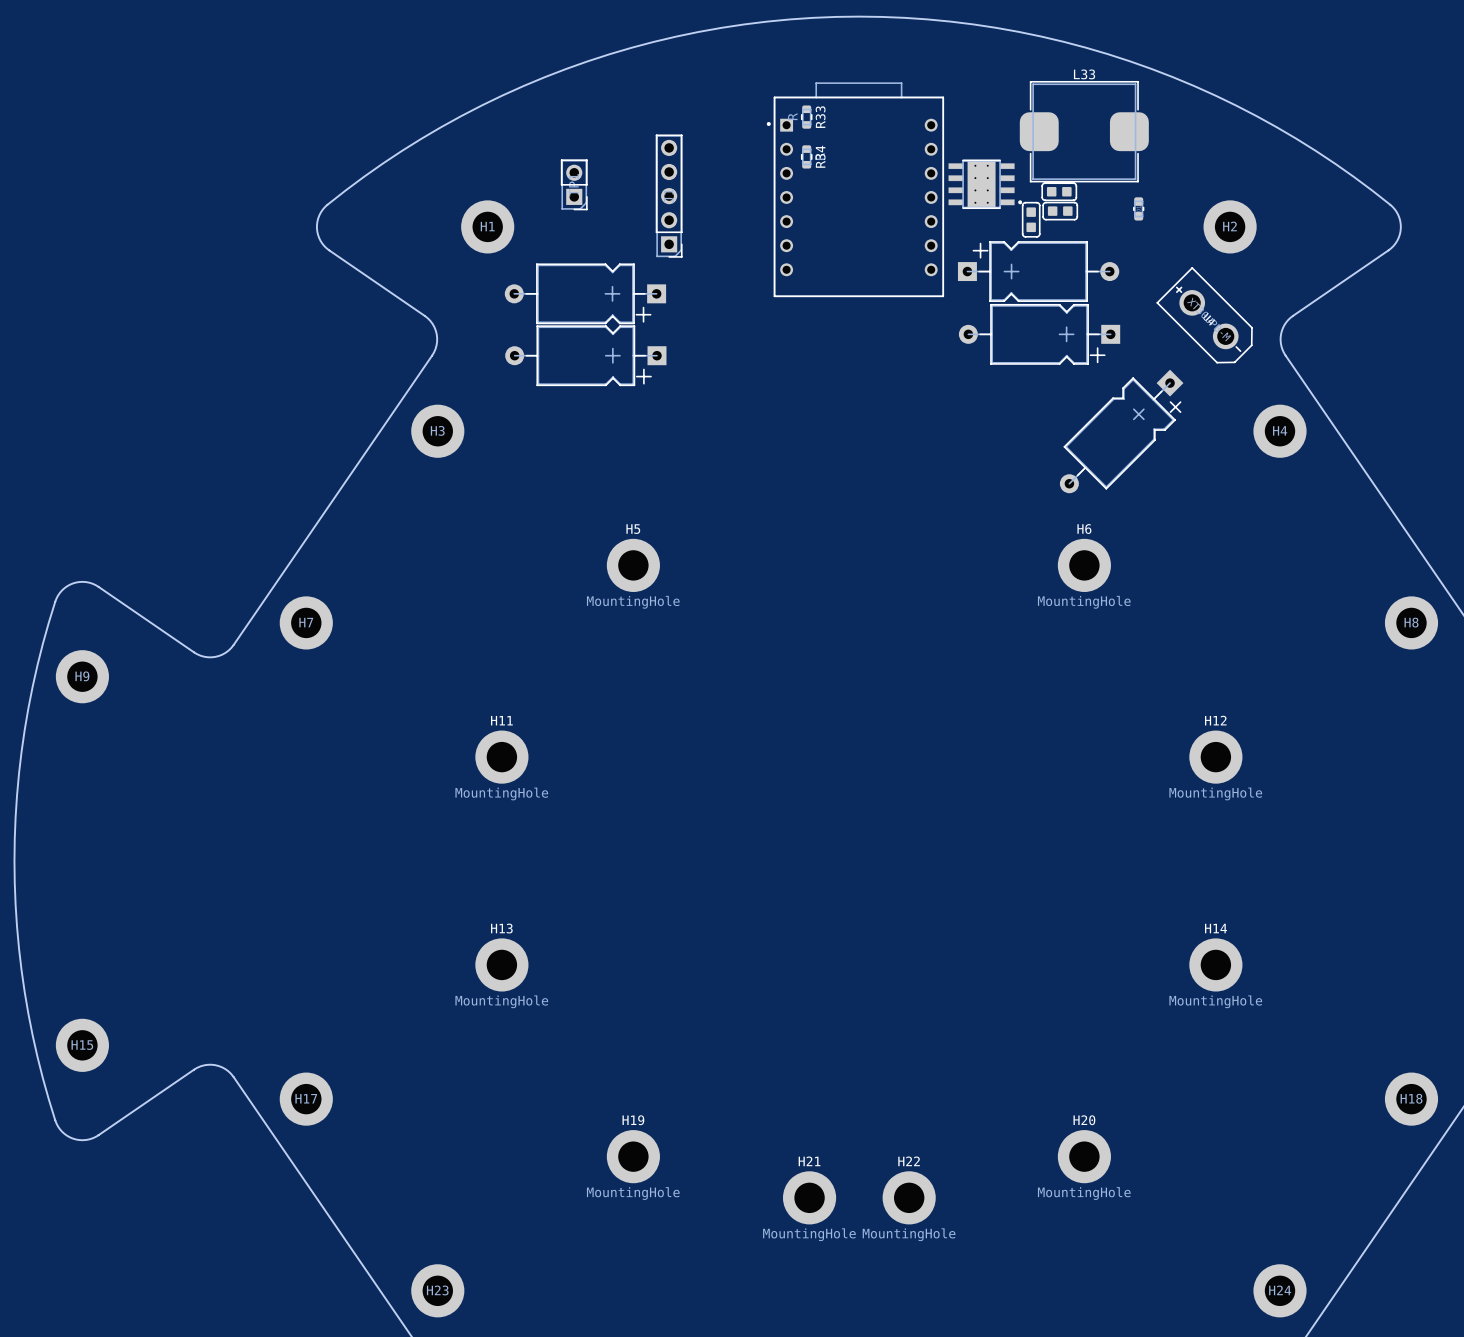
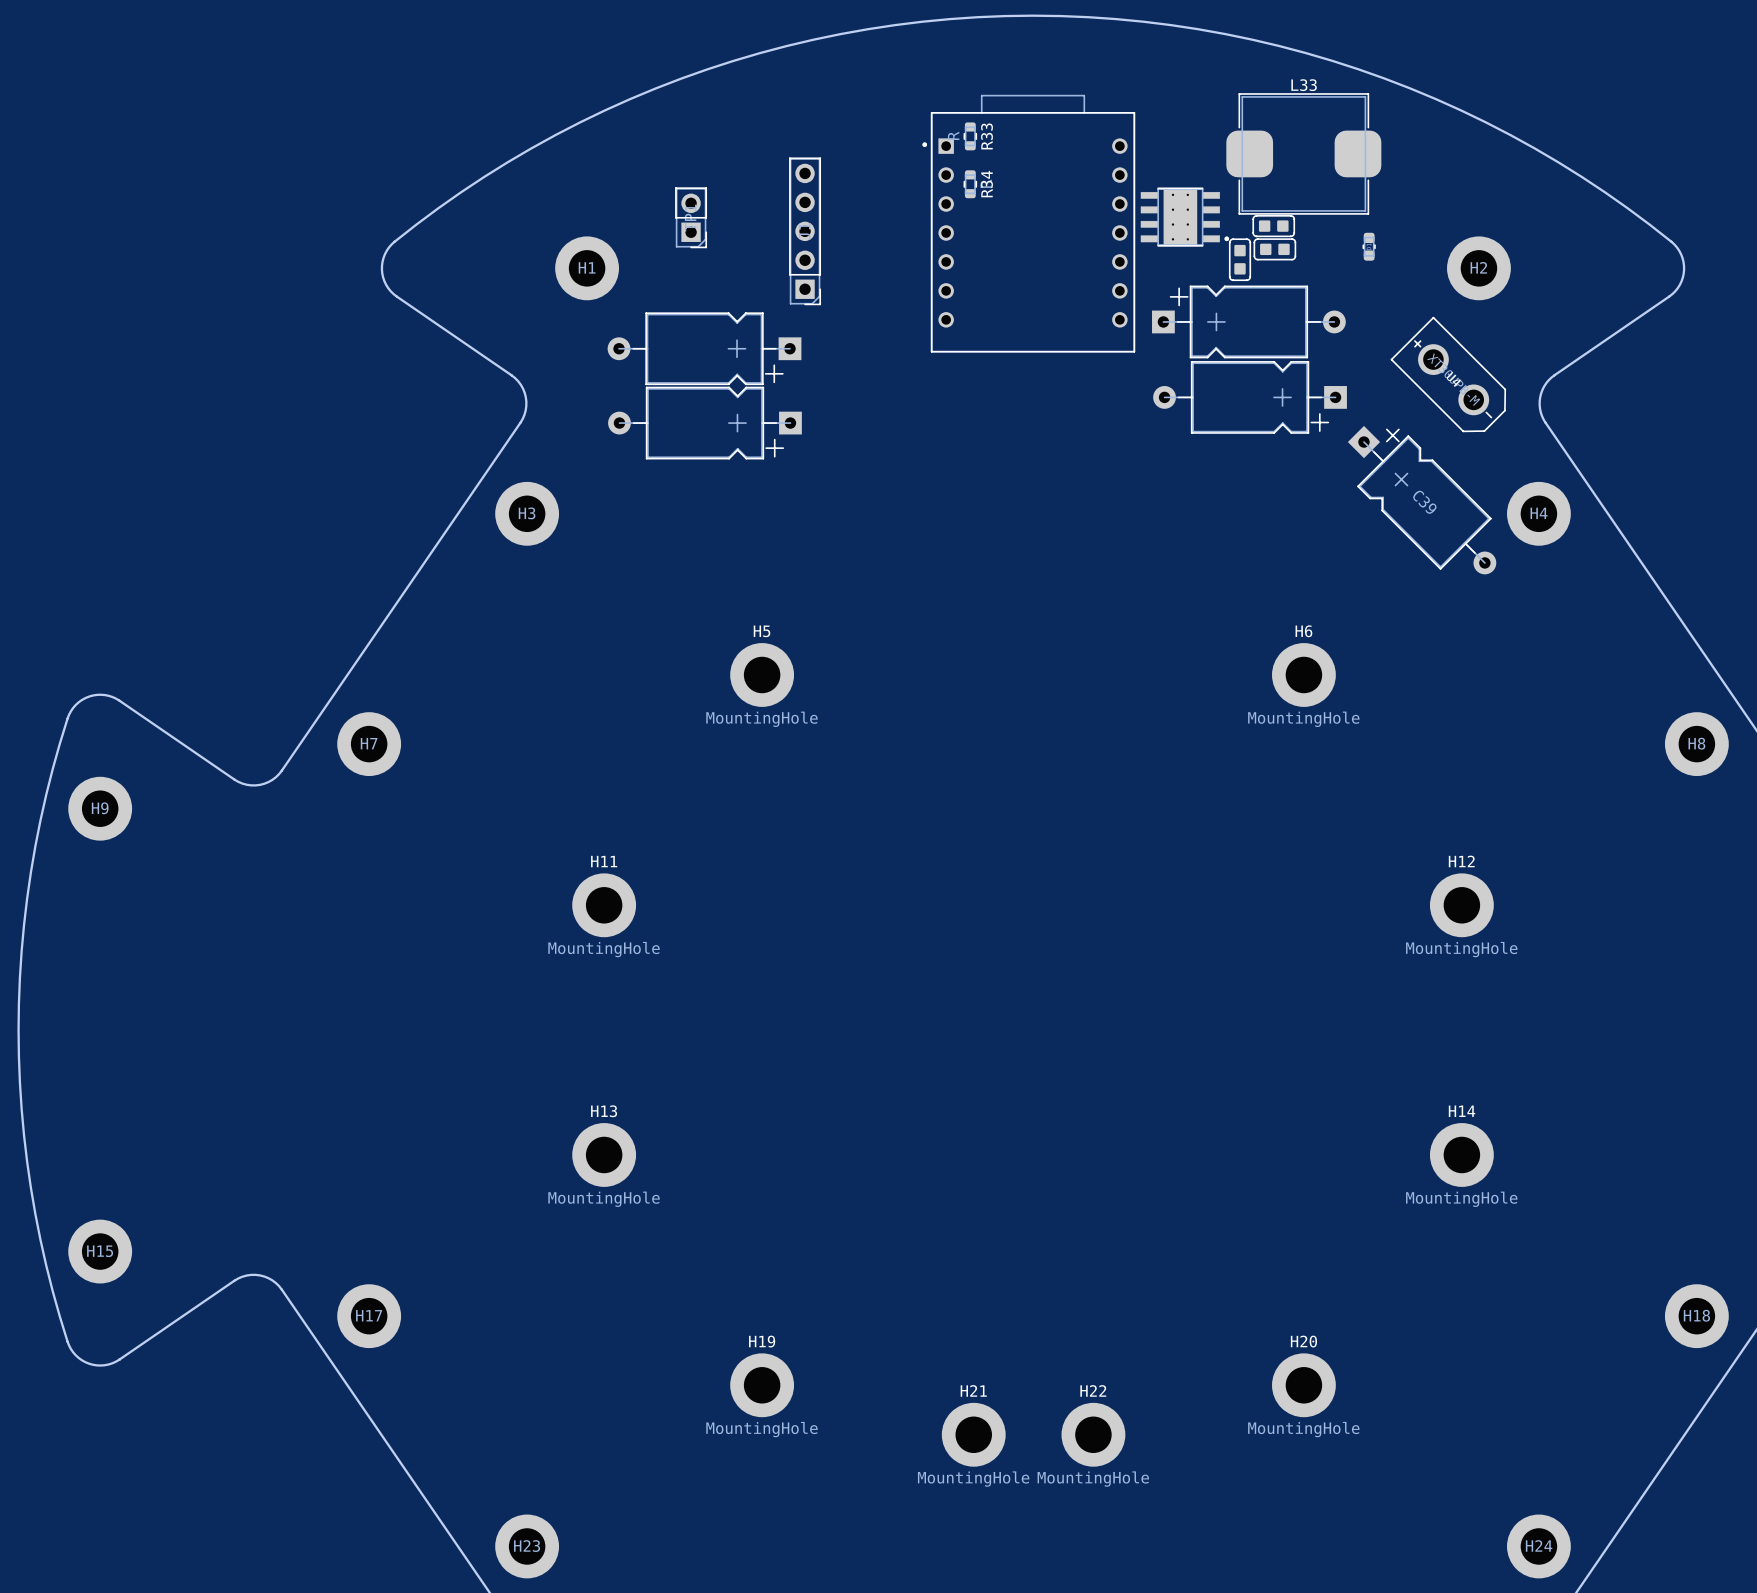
C39: none -> (1422, 500)
part: (1121, 431) -> none

